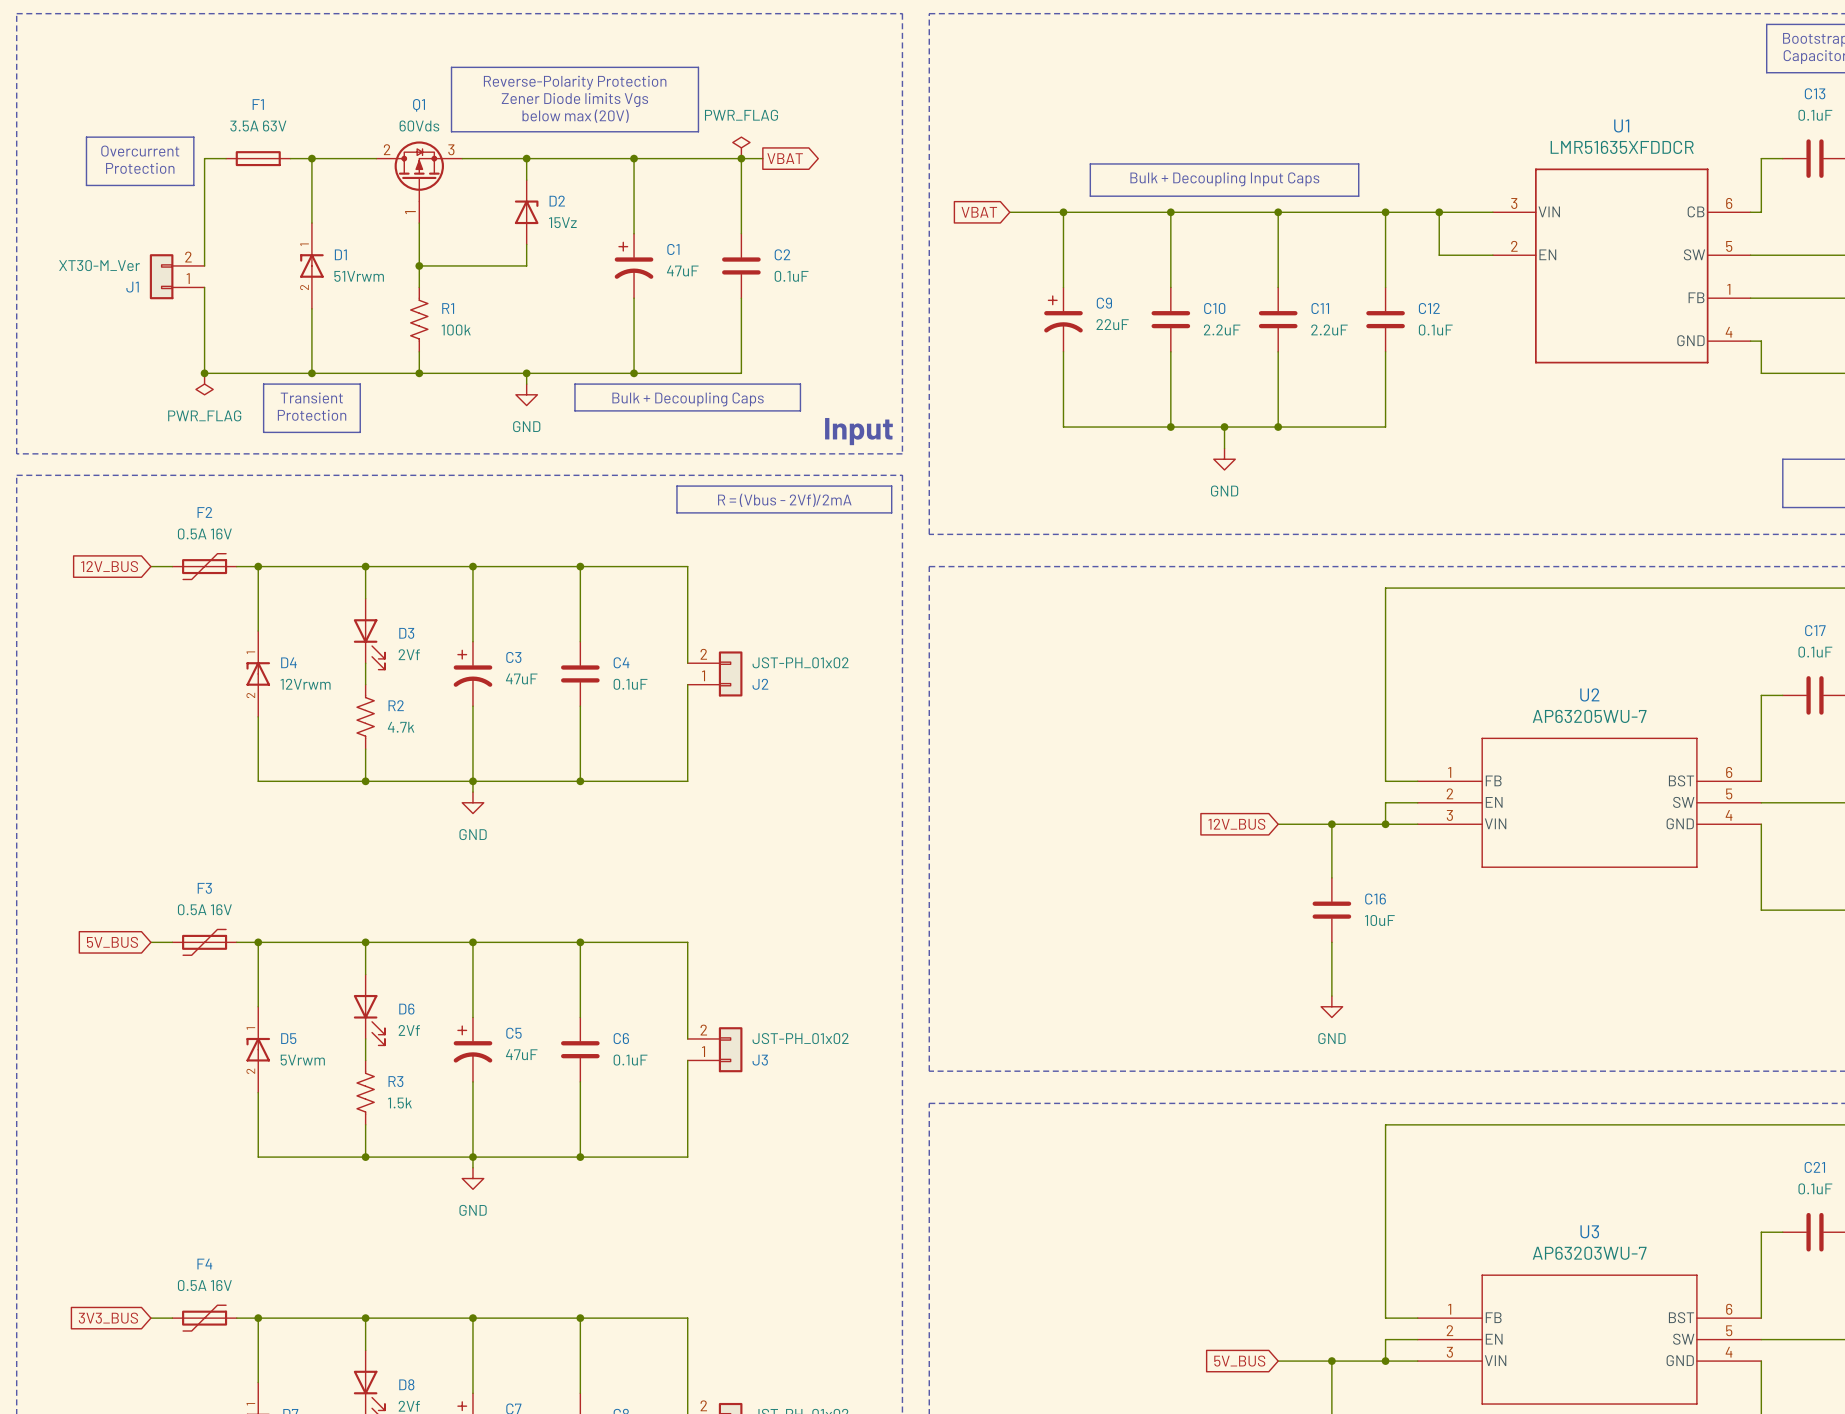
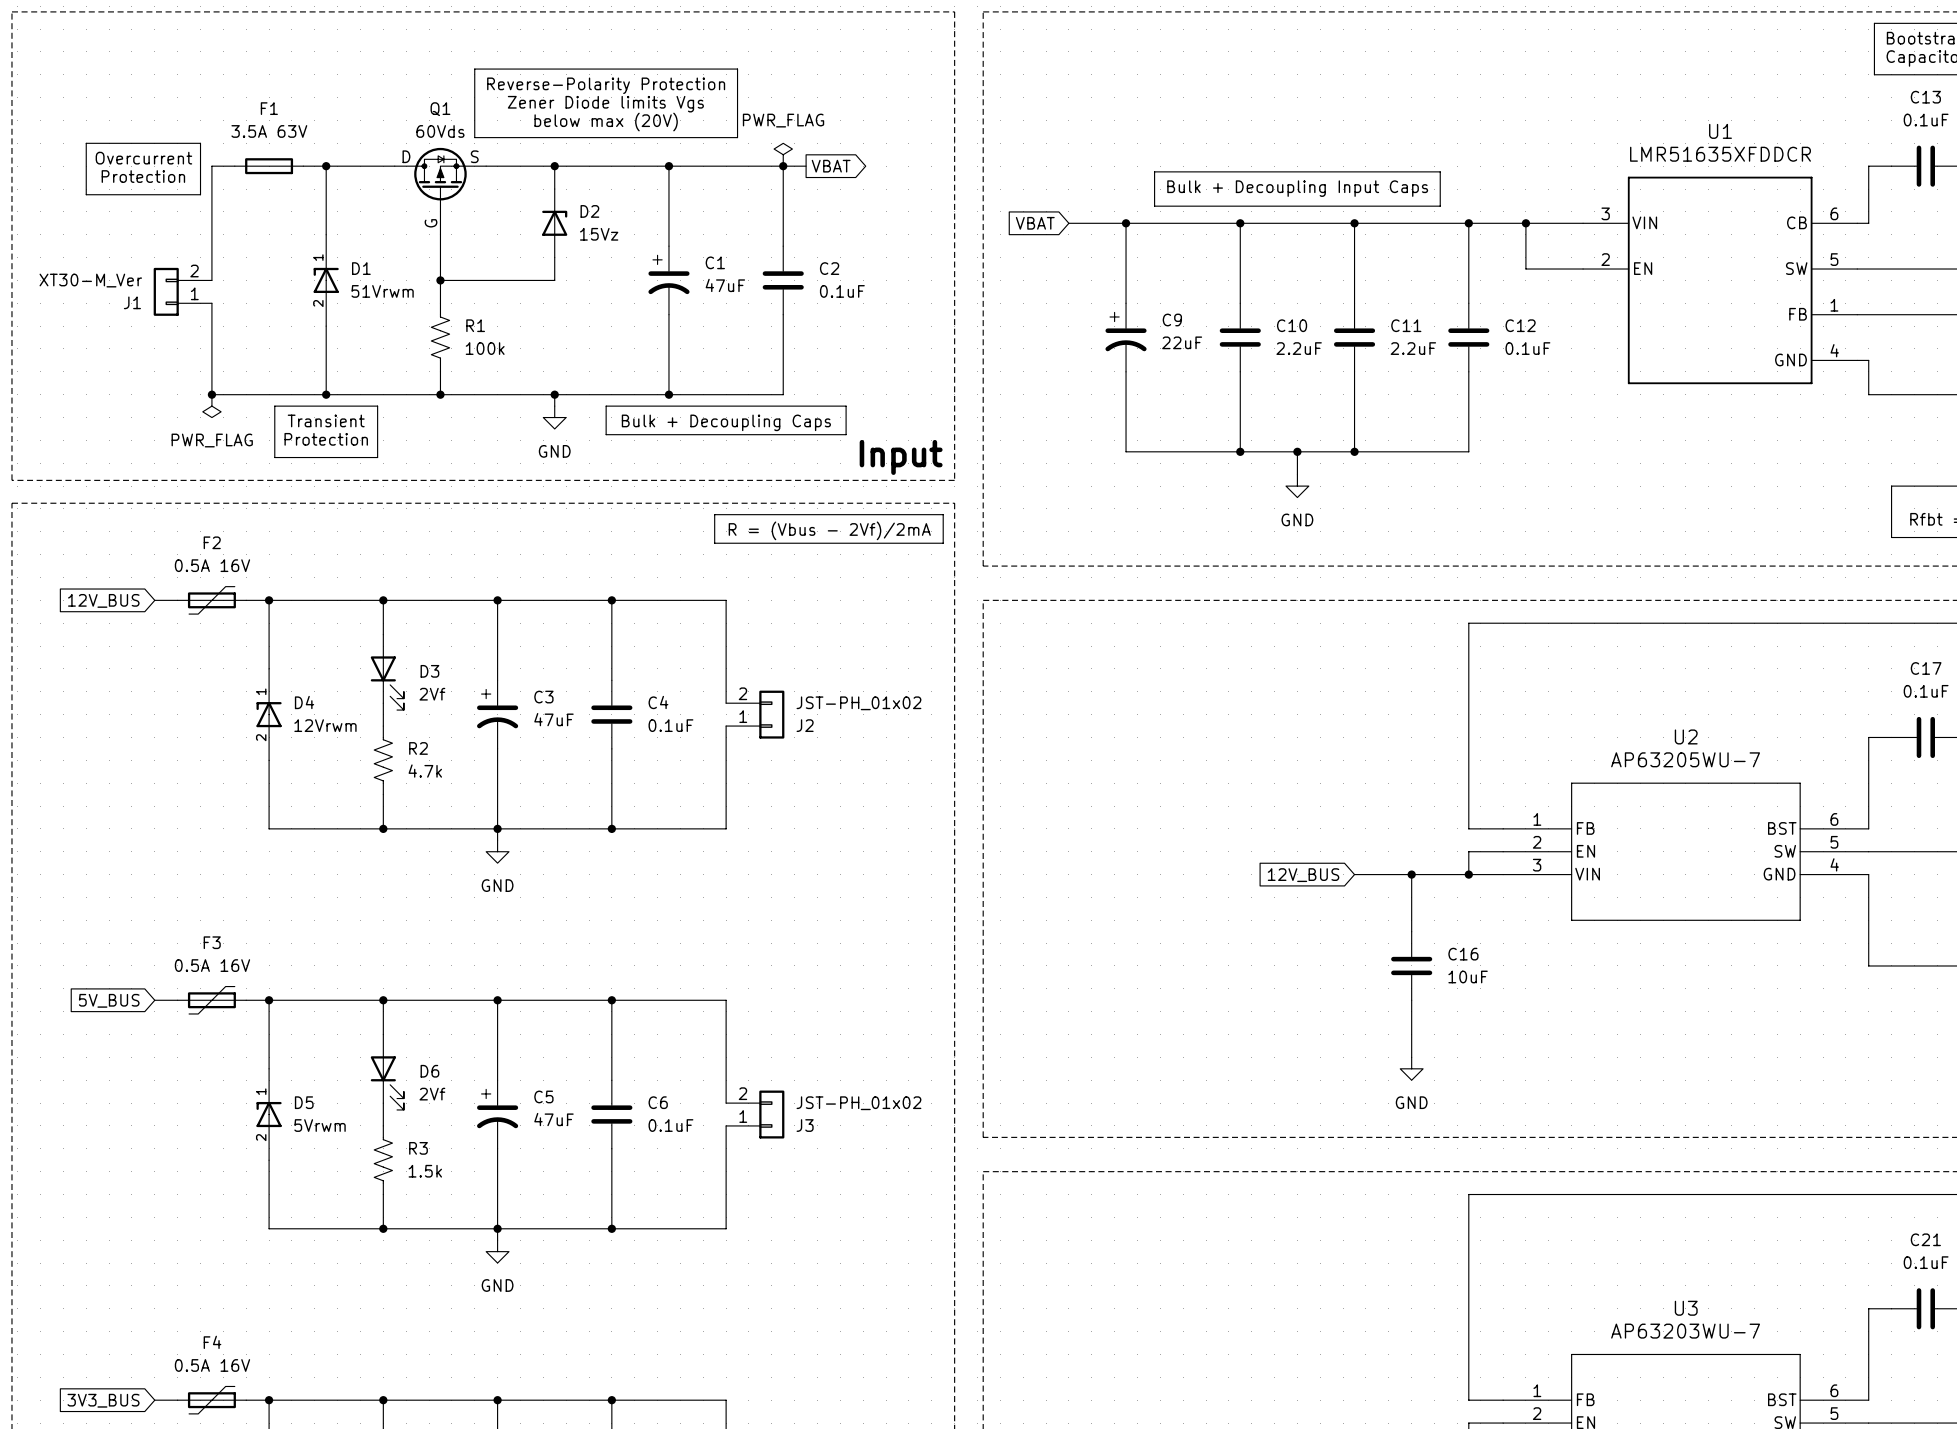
Q1 pin number: 2 (387, 149) -> D (406, 156)
Q1 pin number: 3 (451, 149) -> S (474, 156)
Q1 pin number: 1 (410, 212) -> G (431, 223)

